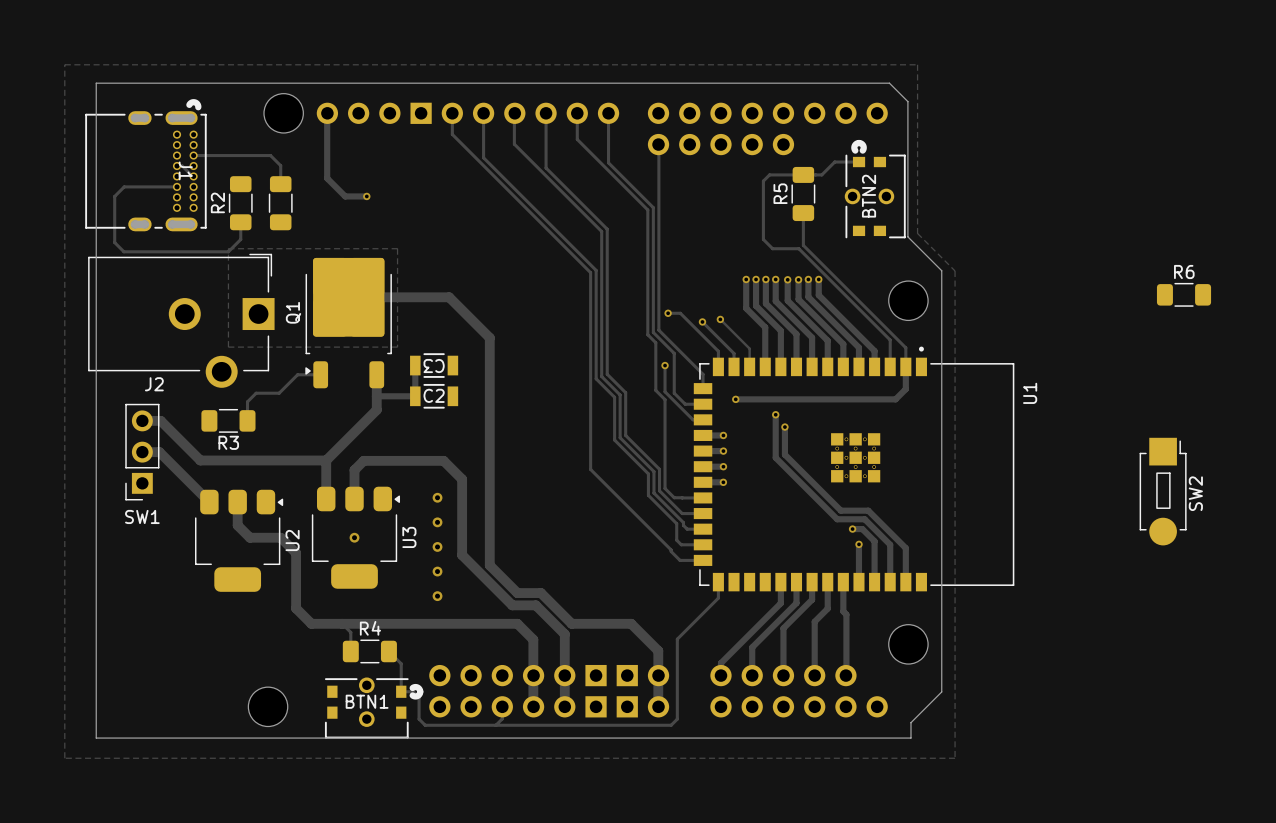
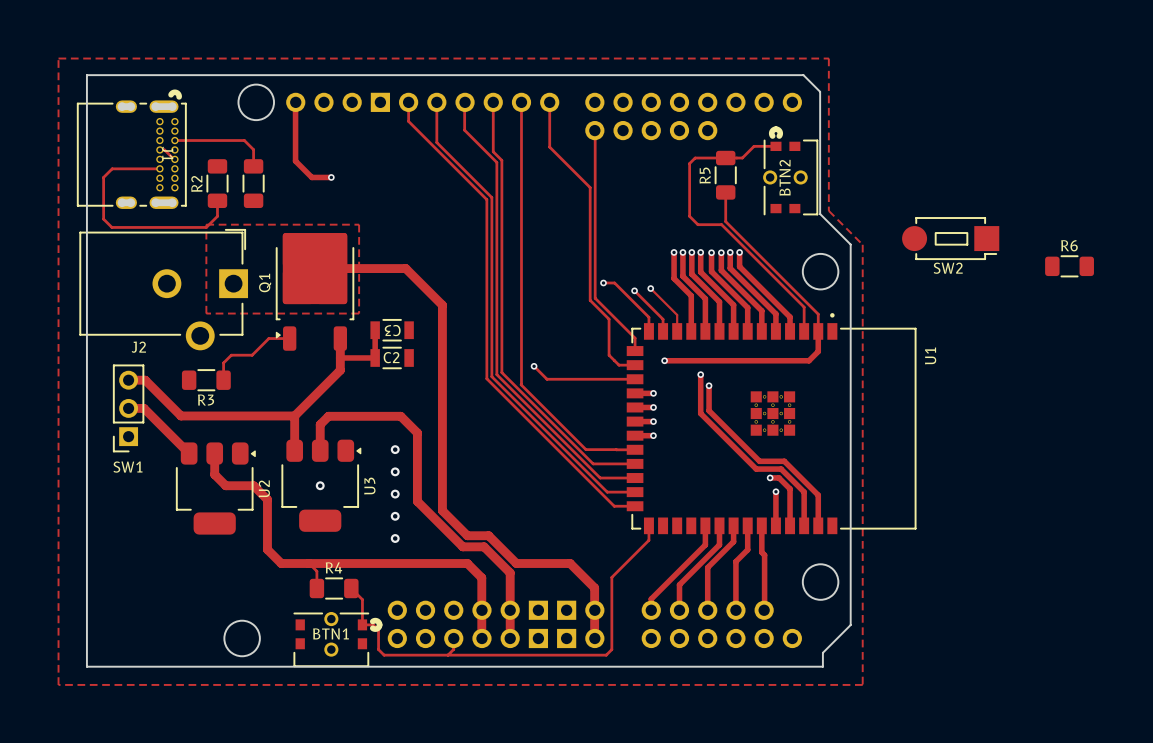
track: (577, 139) (647, 209) (647, 334) (655, 342) (655, 390) (665, 399) (665, 488) (674, 497) -> (521, 125) (521, 384) (585, 449) (609, 449)
track: (555, 177) (607, 229) (607, 374) (625, 392) (625, 435) (659, 469) (659, 490) (682, 513) -> (501, 160) (501, 372) (593, 463) (616, 463)
track: (550, 179) (601, 231) (601, 376) (620, 395) (620, 437) (653, 471) (653, 493) (683, 522) (687, 529) -> (496, 162) (496, 374) (600, 478) (620, 478)
track: (544, 218) (596, 270) (596, 378) (614, 397) (614, 440) (648, 473) (648, 495) (676, 523) (676, 540) (681, 544) -> (491, 197) (491, 376) (607, 492) (615, 492)
track: (538, 221) (590, 272) (590, 469) (671, 551) -> (486, 199) (486, 378) (606, 498)
track: (665, 365) (665, 391) (693, 419) -> (534, 366) (547, 379) (626, 379)
via: (665, 365) -> none
via: none -> (534, 366)
SW2 rotation: 0° (1163, 491) -> 90° clockwise (950, 238)
SW2 position: (1163, 491) -> (950, 238)

